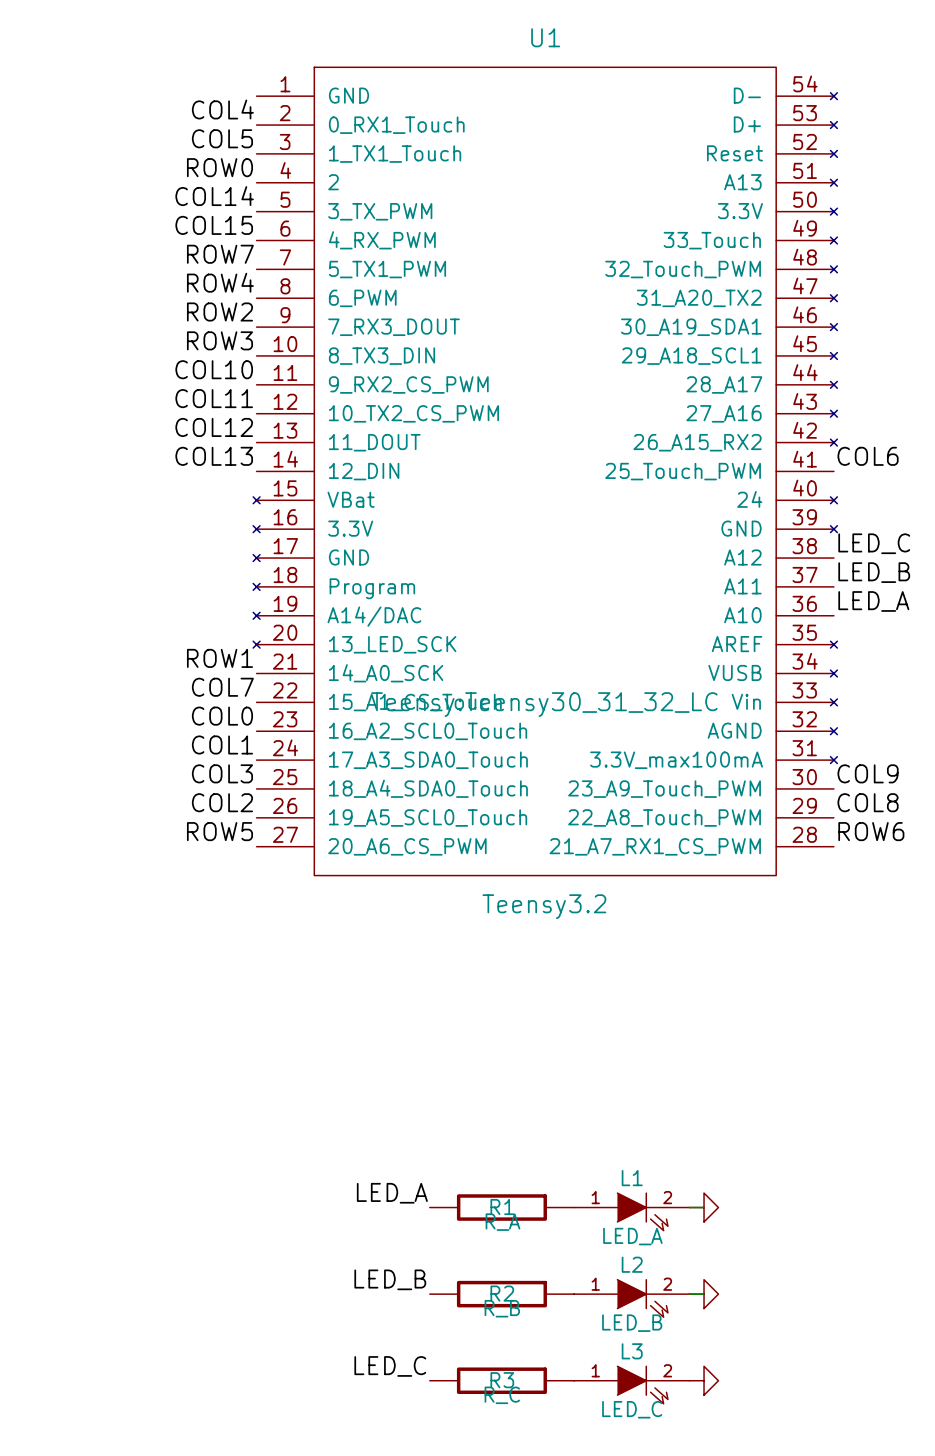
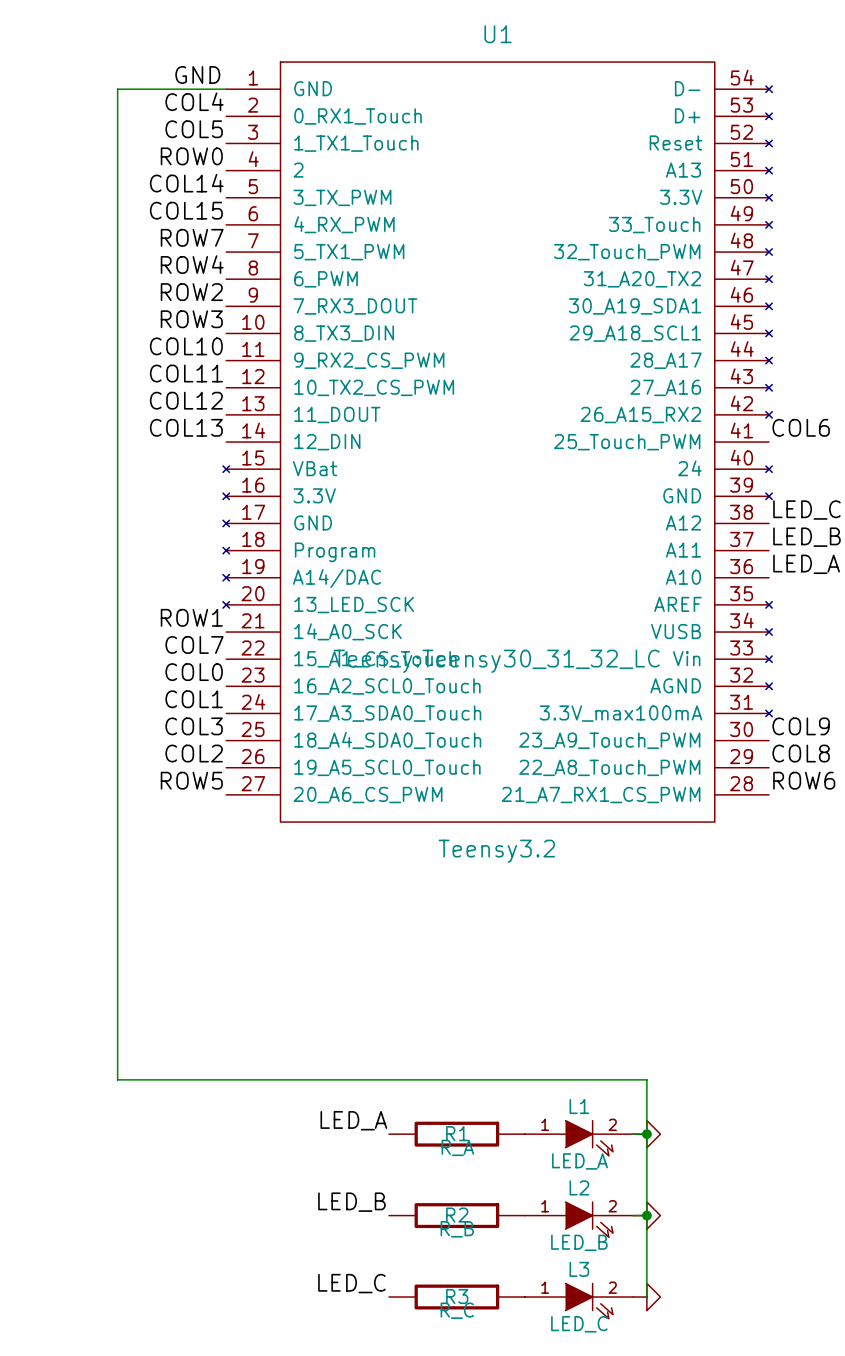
label: none -> GND (197, 74)
wire: none -> (226, 89) (117, 89) (117, 1079) (646, 1079) (646, 1297)
junction: none -> (646, 1134)
junction: none -> (646, 1215)

